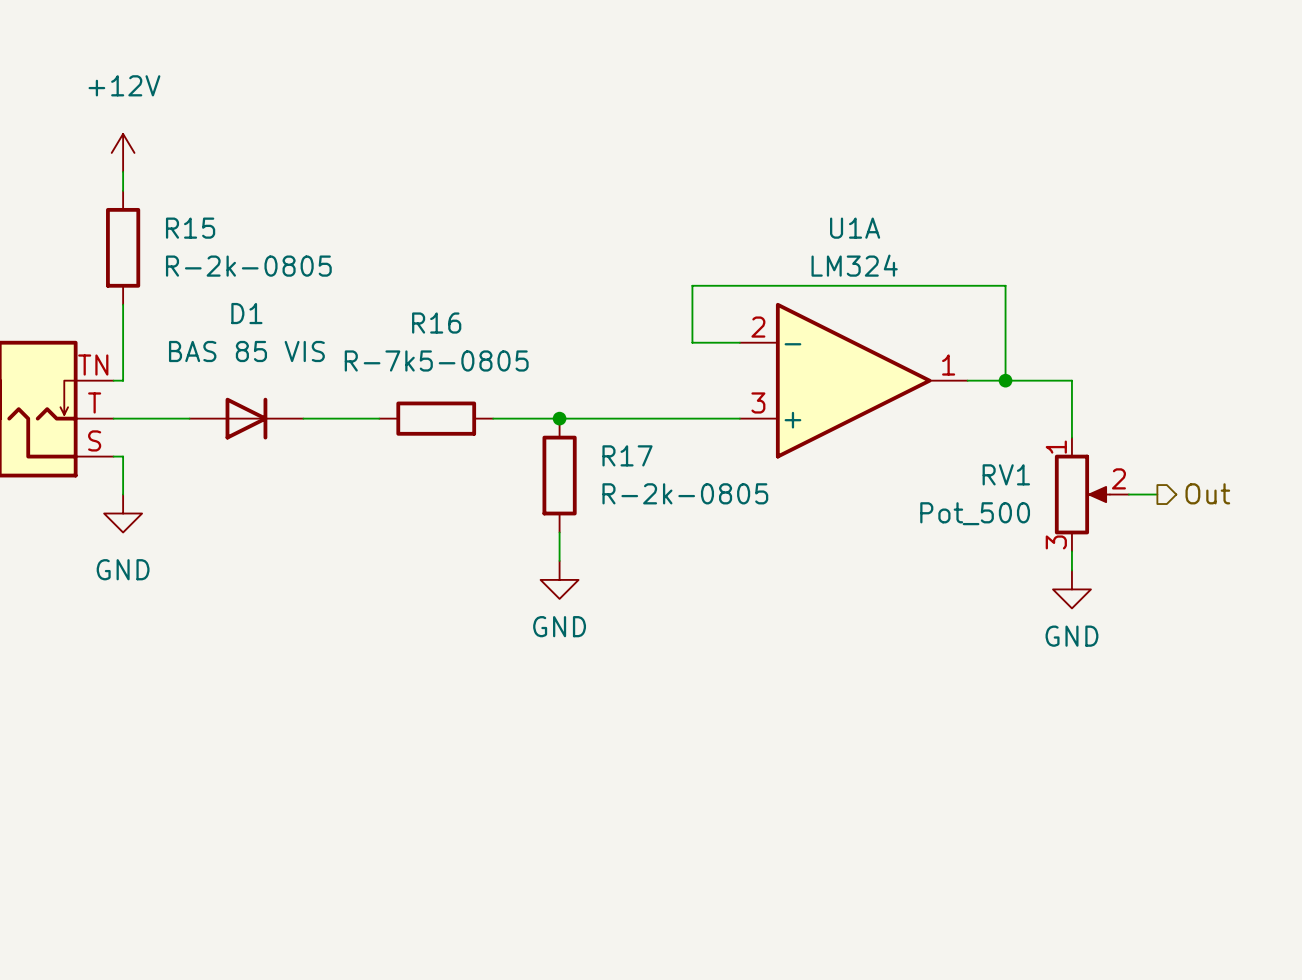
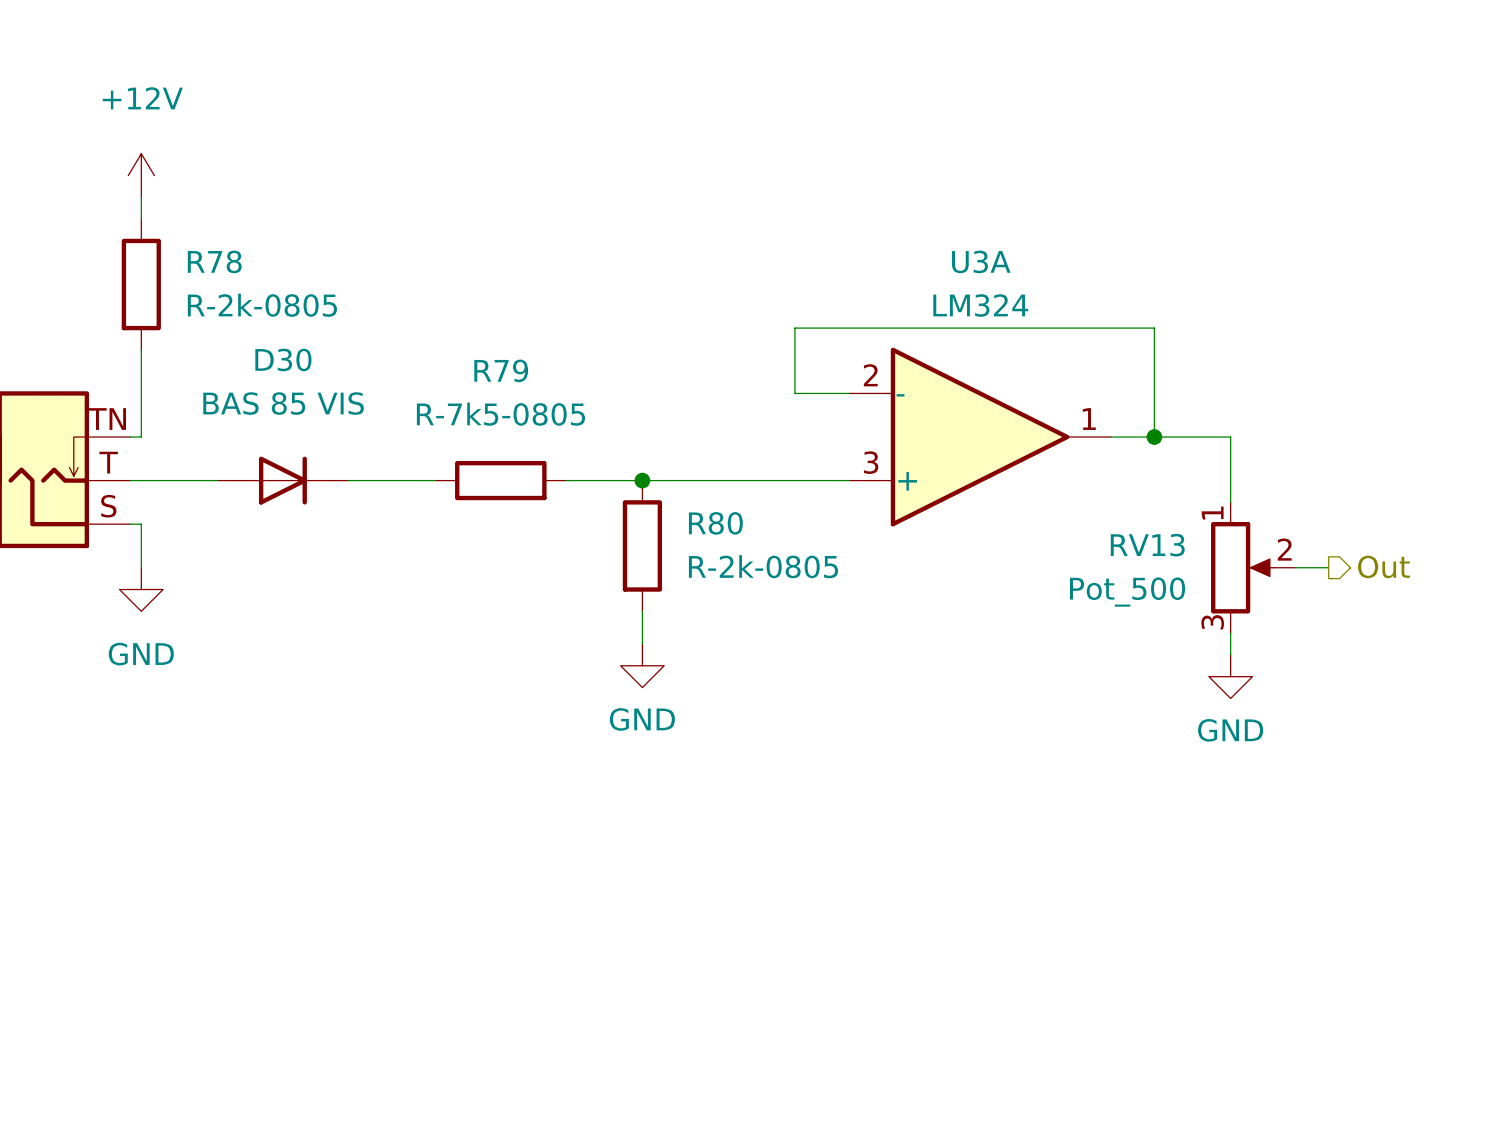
R15 name: R15 (190, 228) -> R78 (214, 261)
U1A name: U1A (855, 228) -> U3A (981, 261)
D1 name: D1 (246, 313) -> D30 (283, 359)
R16 name: R16 (436, 323) -> R79 (501, 370)
R17 name: R17 (627, 455) -> R80 (715, 523)
RV1 name: RV1 (1006, 474) -> RV13 (1147, 545)

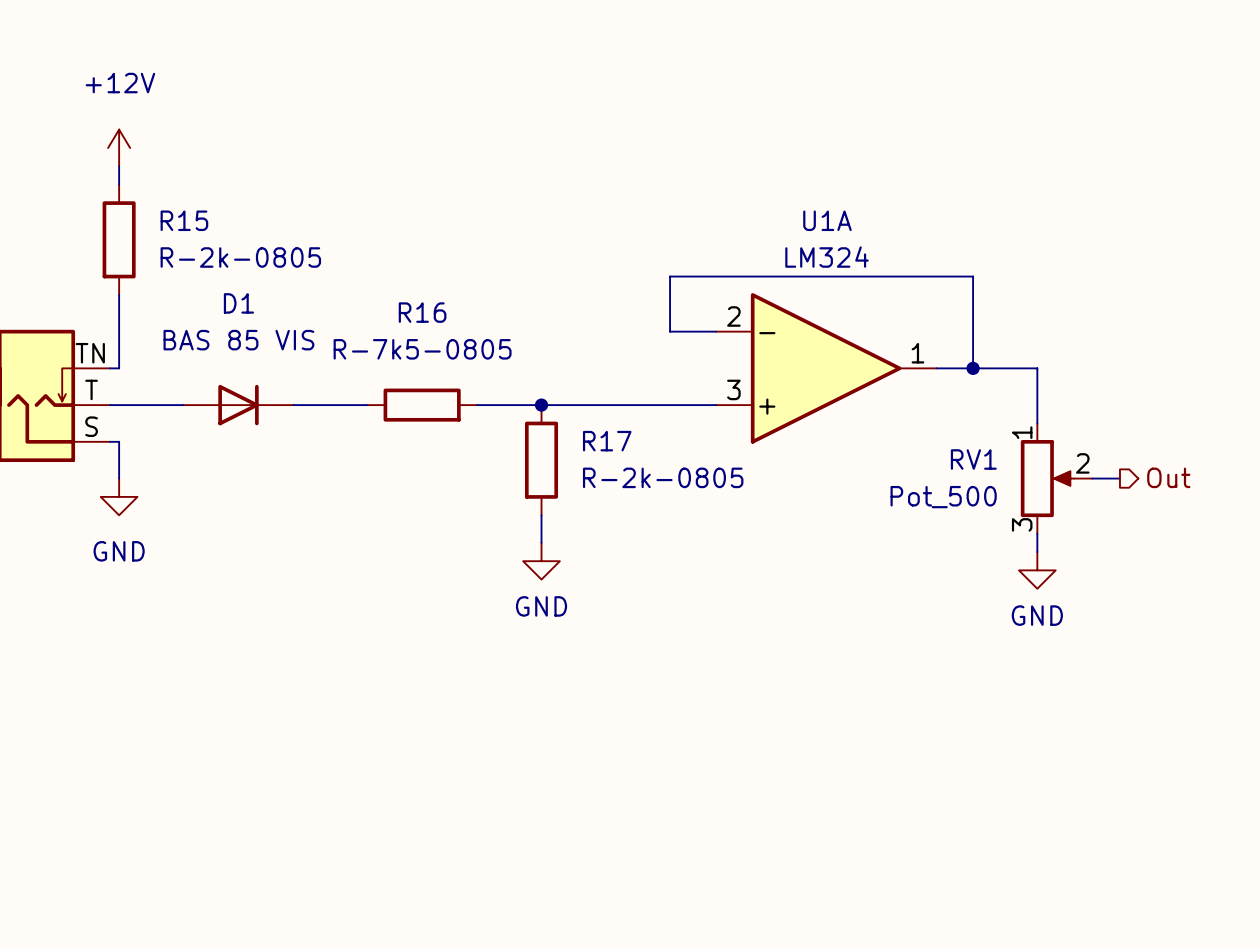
R78 name: R78 (214, 261) -> R15 (184, 220)
U3A name: U3A (981, 261) -> U1A (827, 220)
D30 name: D30 (283, 359) -> D1 (238, 303)
R79 name: R79 (501, 370) -> R16 (422, 312)
R80 name: R80 (715, 523) -> R17 (607, 441)
RV13 name: RV13 (1147, 545) -> RV1 (973, 459)

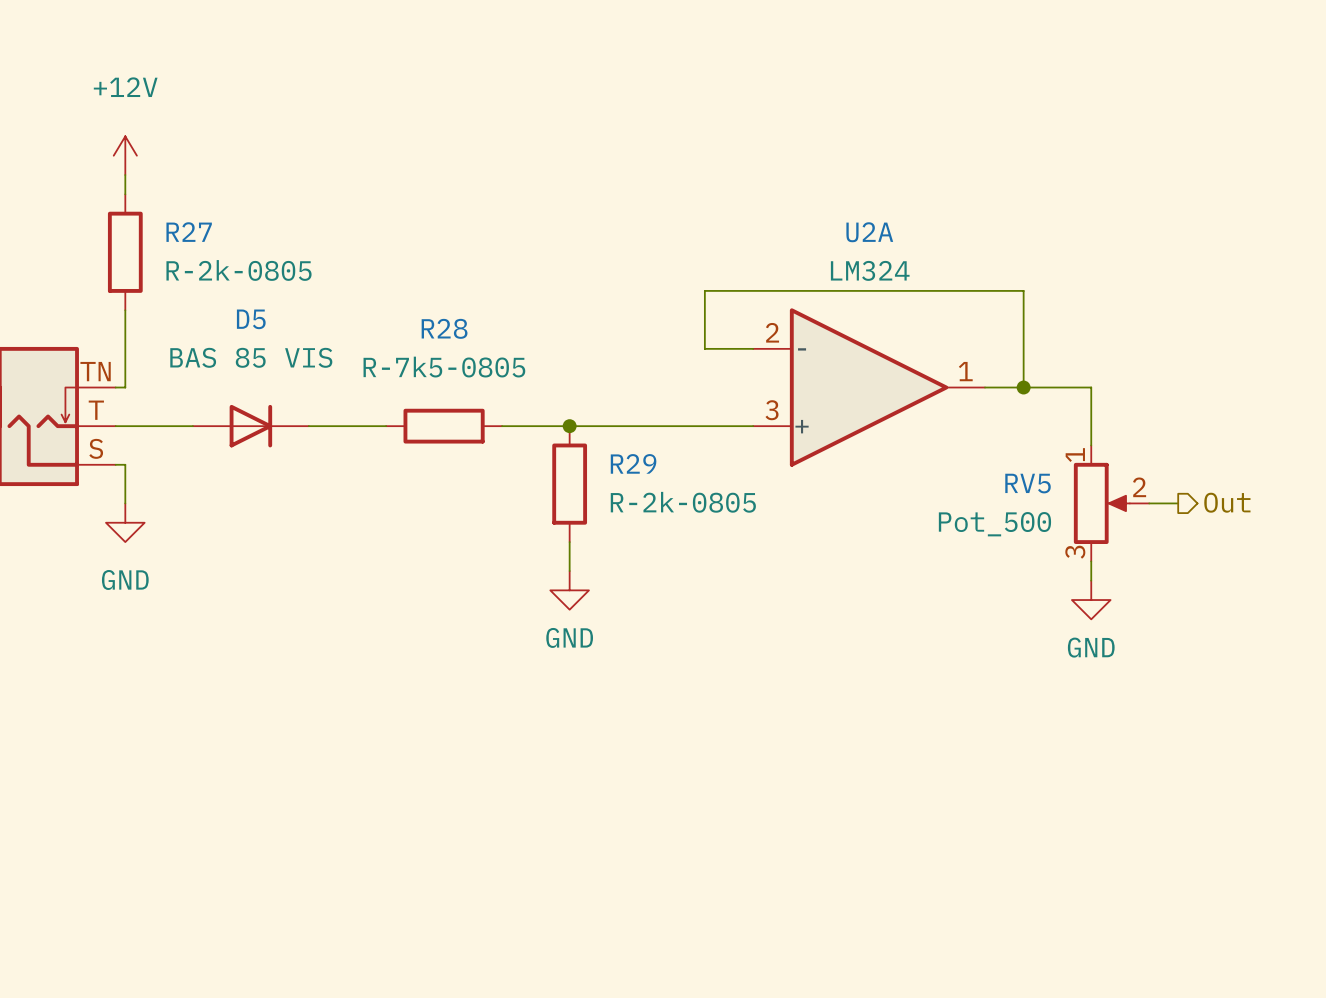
R15 name: R15 (184, 220) -> R27 (189, 232)
U1A name: U1A (827, 220) -> U2A (869, 232)
D1 name: D1 (238, 303) -> D5 (251, 319)
R16 name: R16 (422, 312) -> R28 (444, 328)
R17 name: R17 (607, 441) -> R29 (633, 463)
RV1 name: RV1 (973, 459) -> RV5 (1028, 483)

